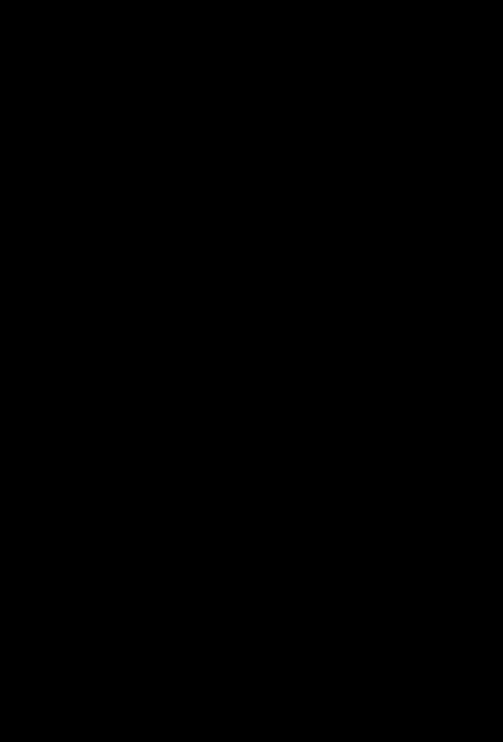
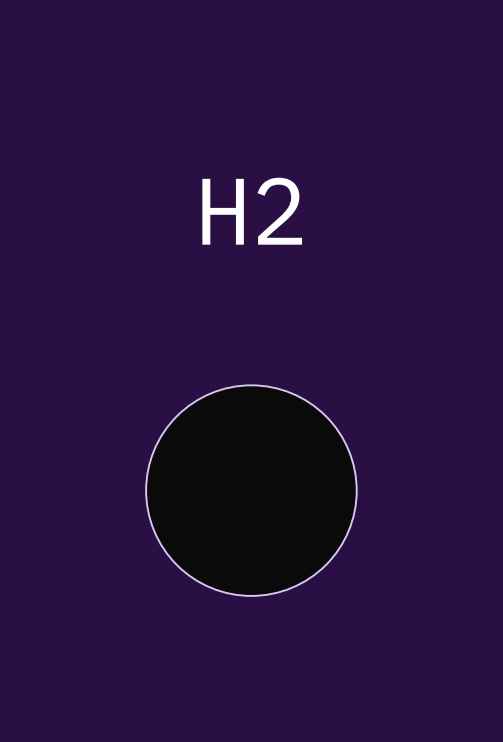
H2: none -> (251, 490)

